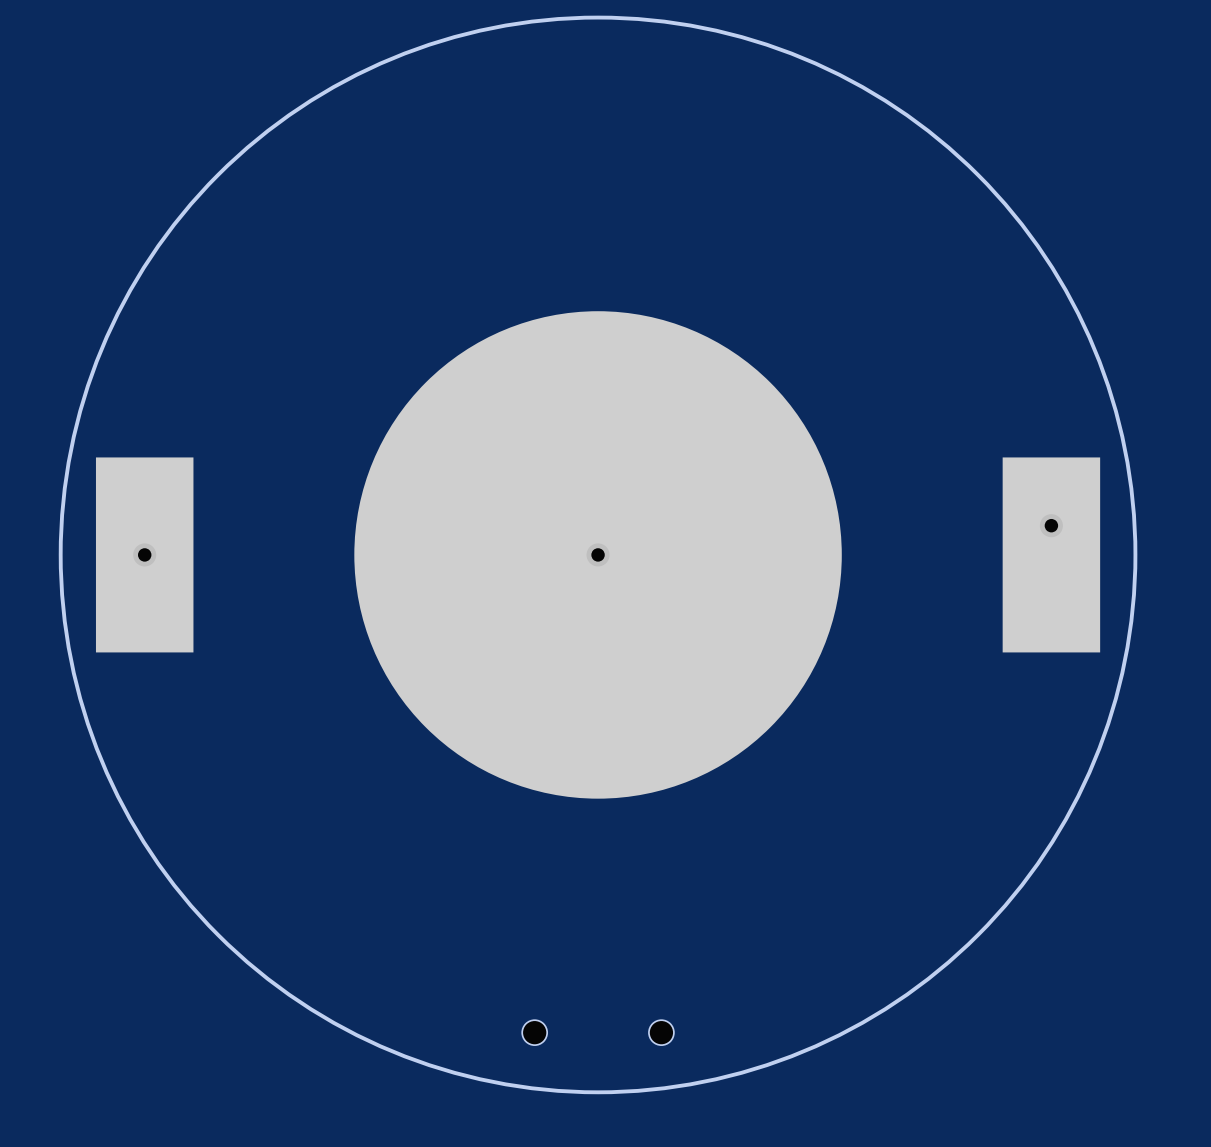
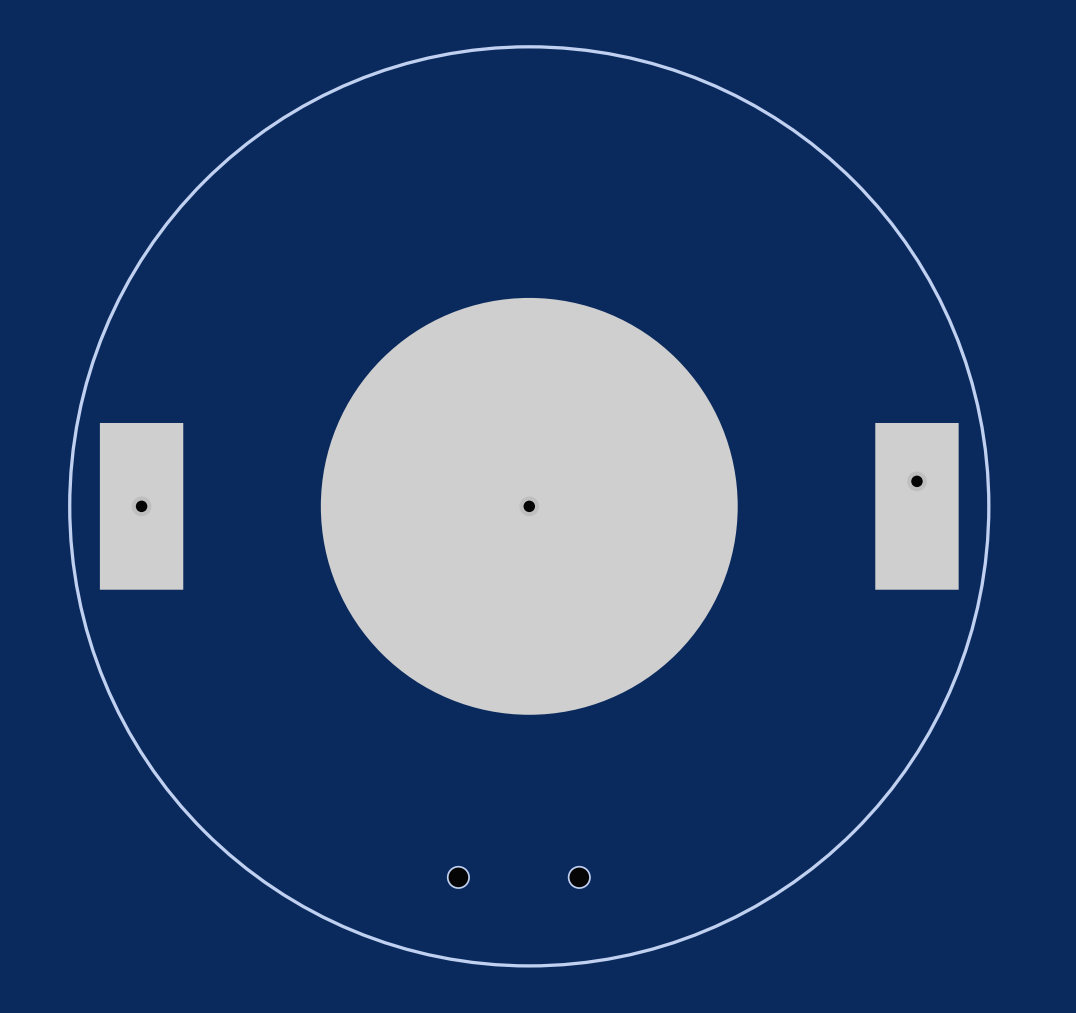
hole position: (534, 1032) -> (458, 877)
hole position: (661, 1032) -> (579, 877)

